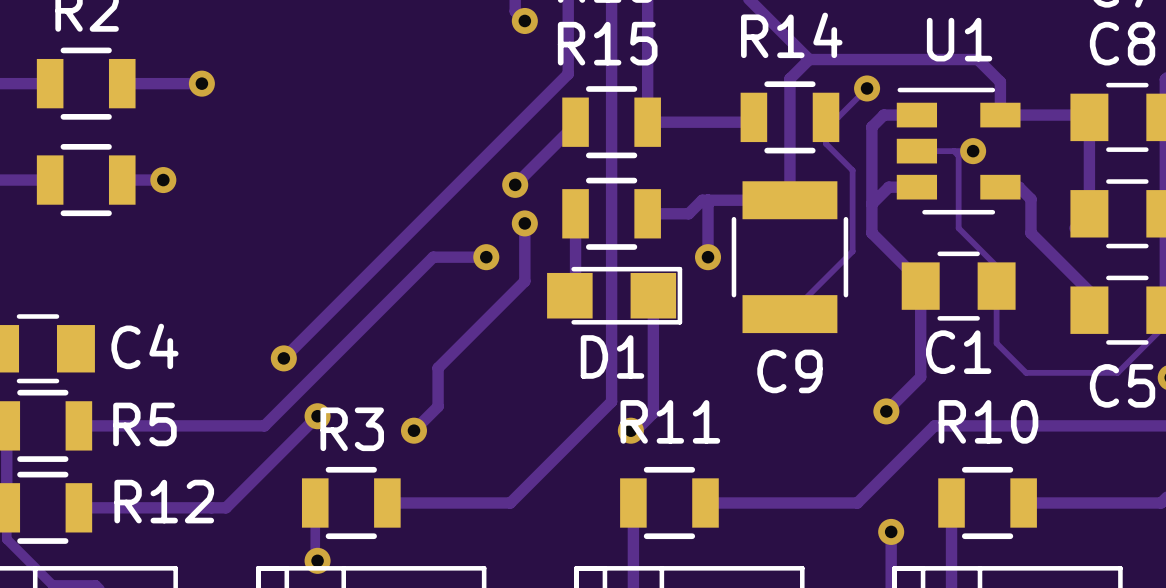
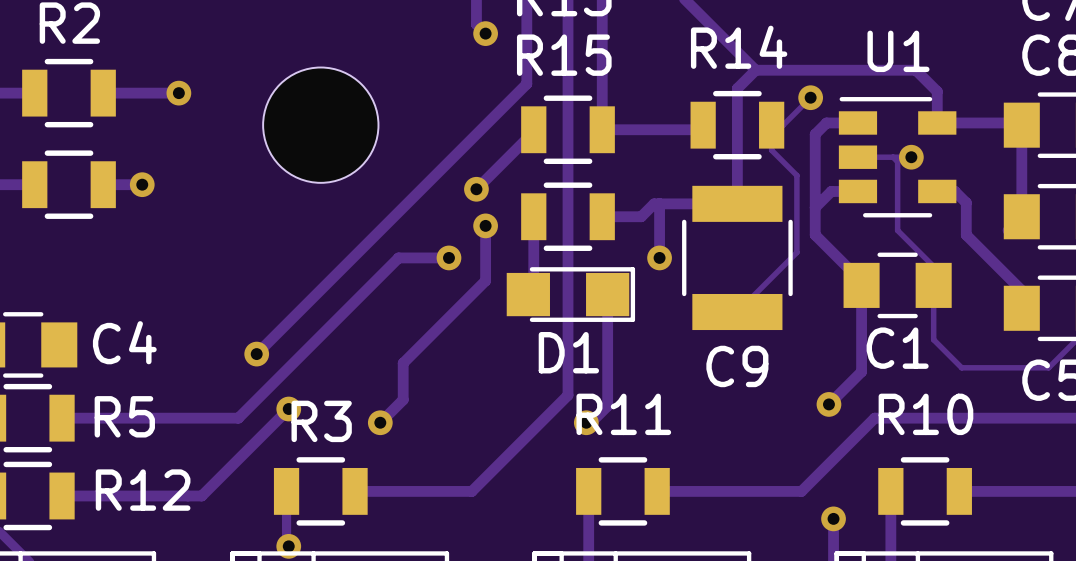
part: none -> (320, 125)

